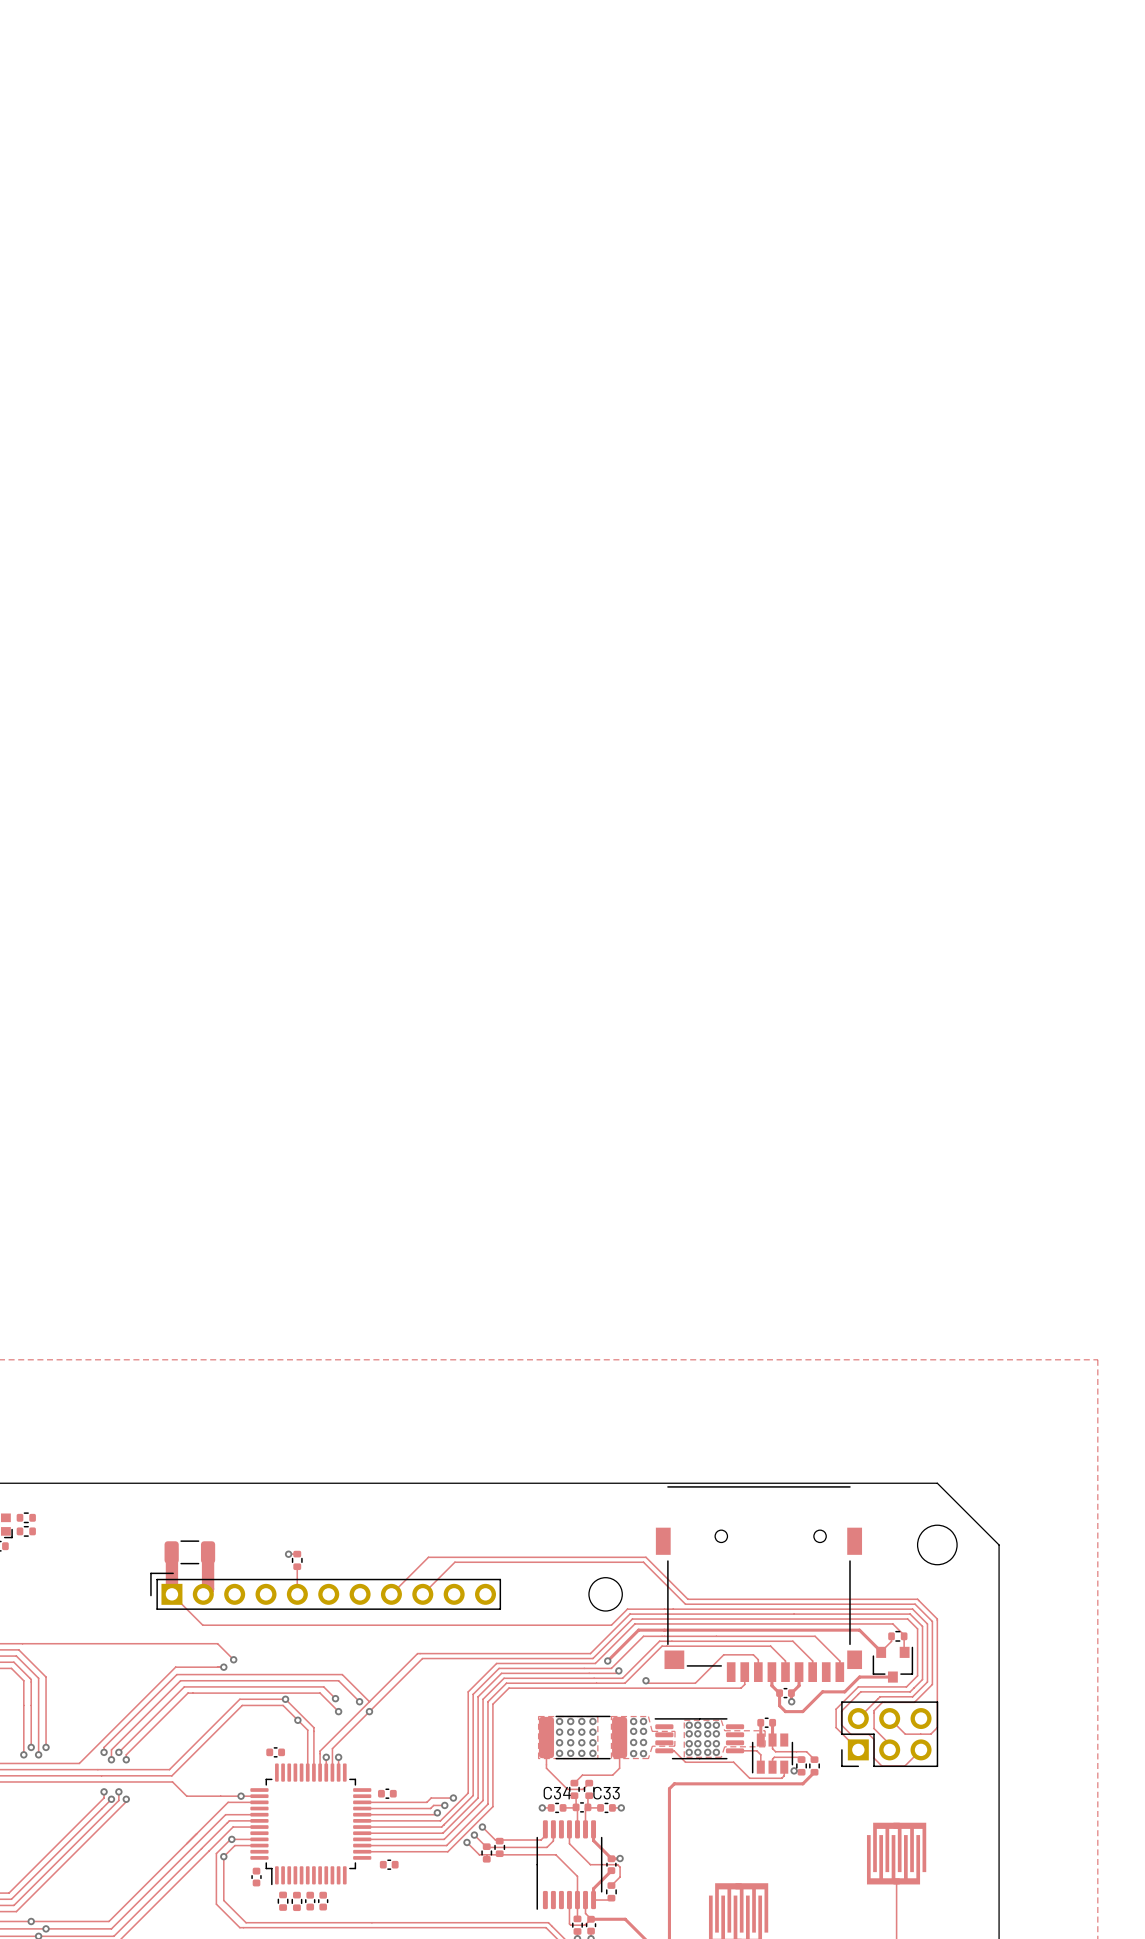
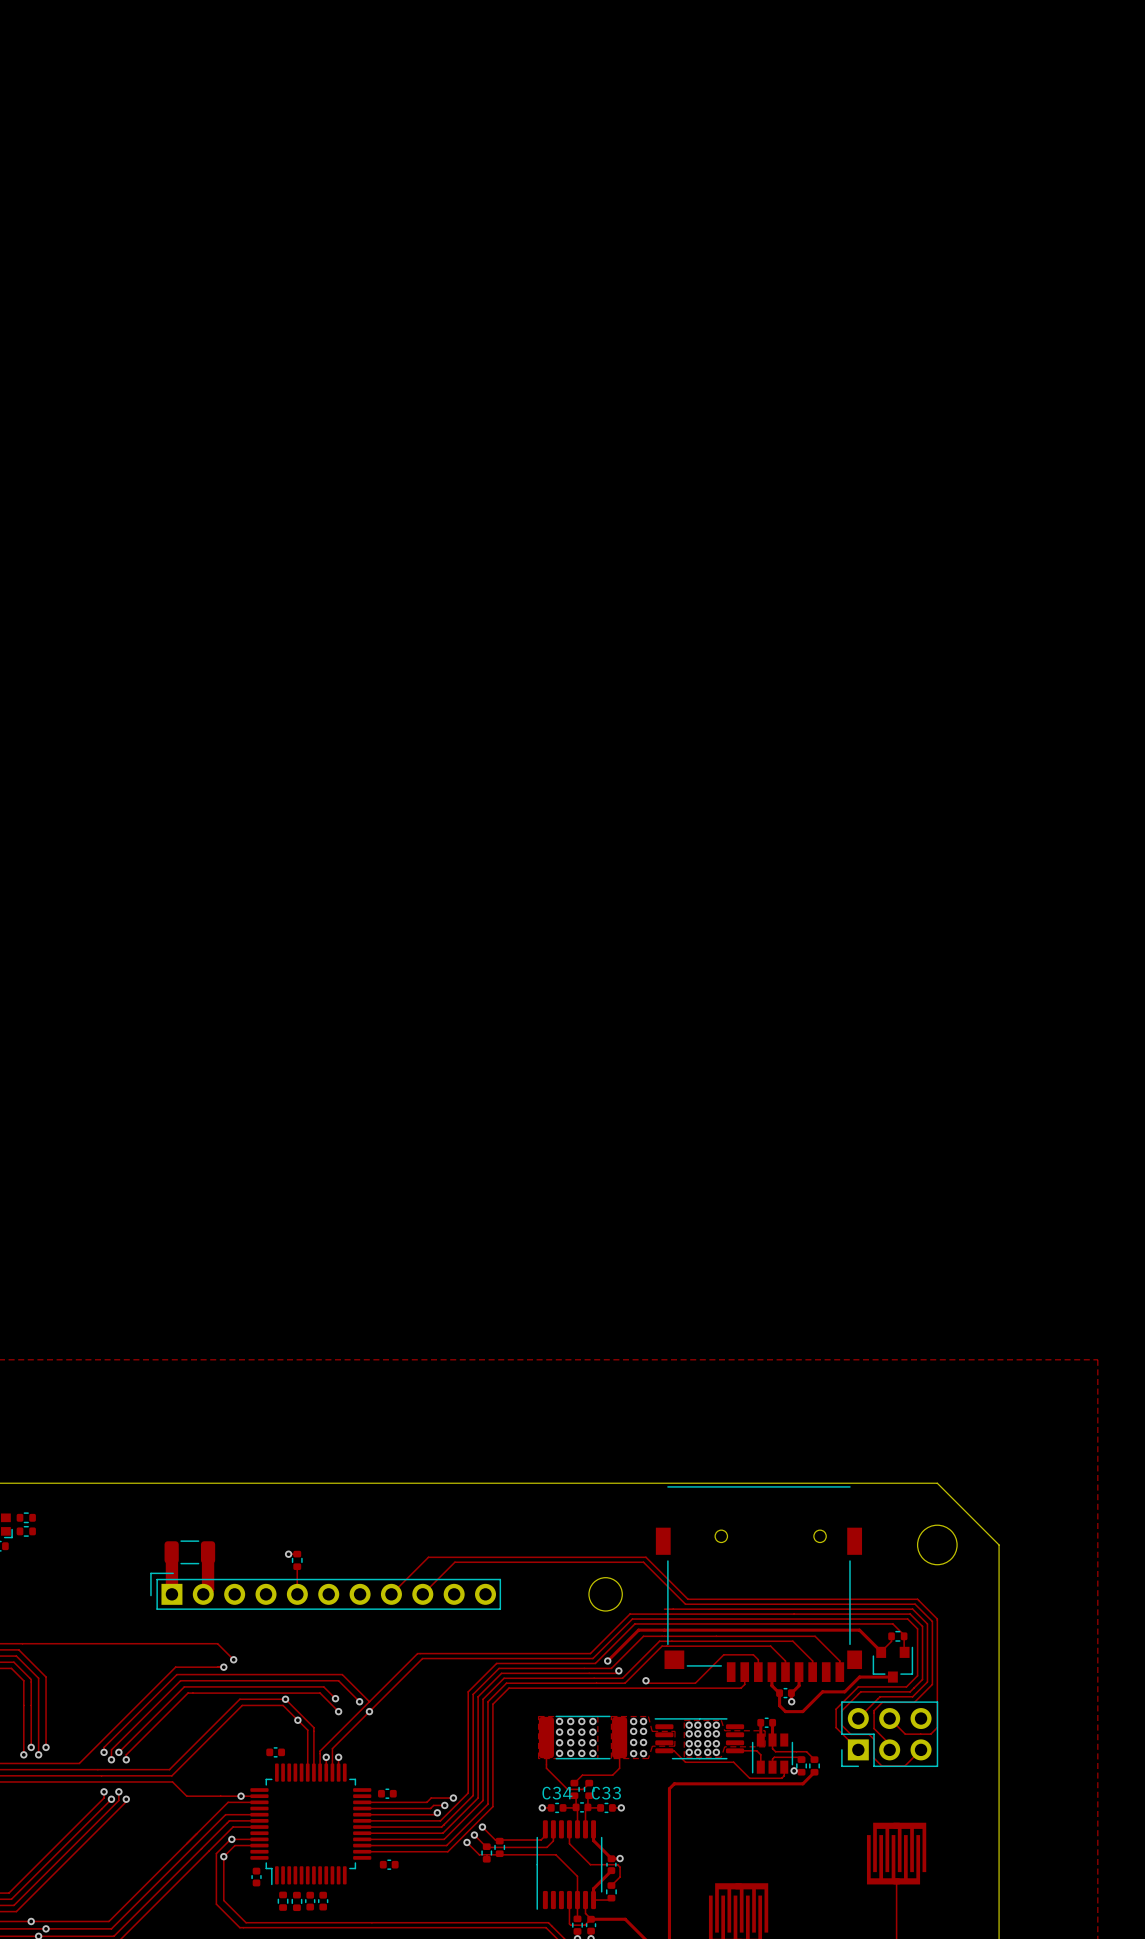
track: (171, 1594) (202, 1625) (611, 1625) (627, 1609) (664, 1609) -> none

